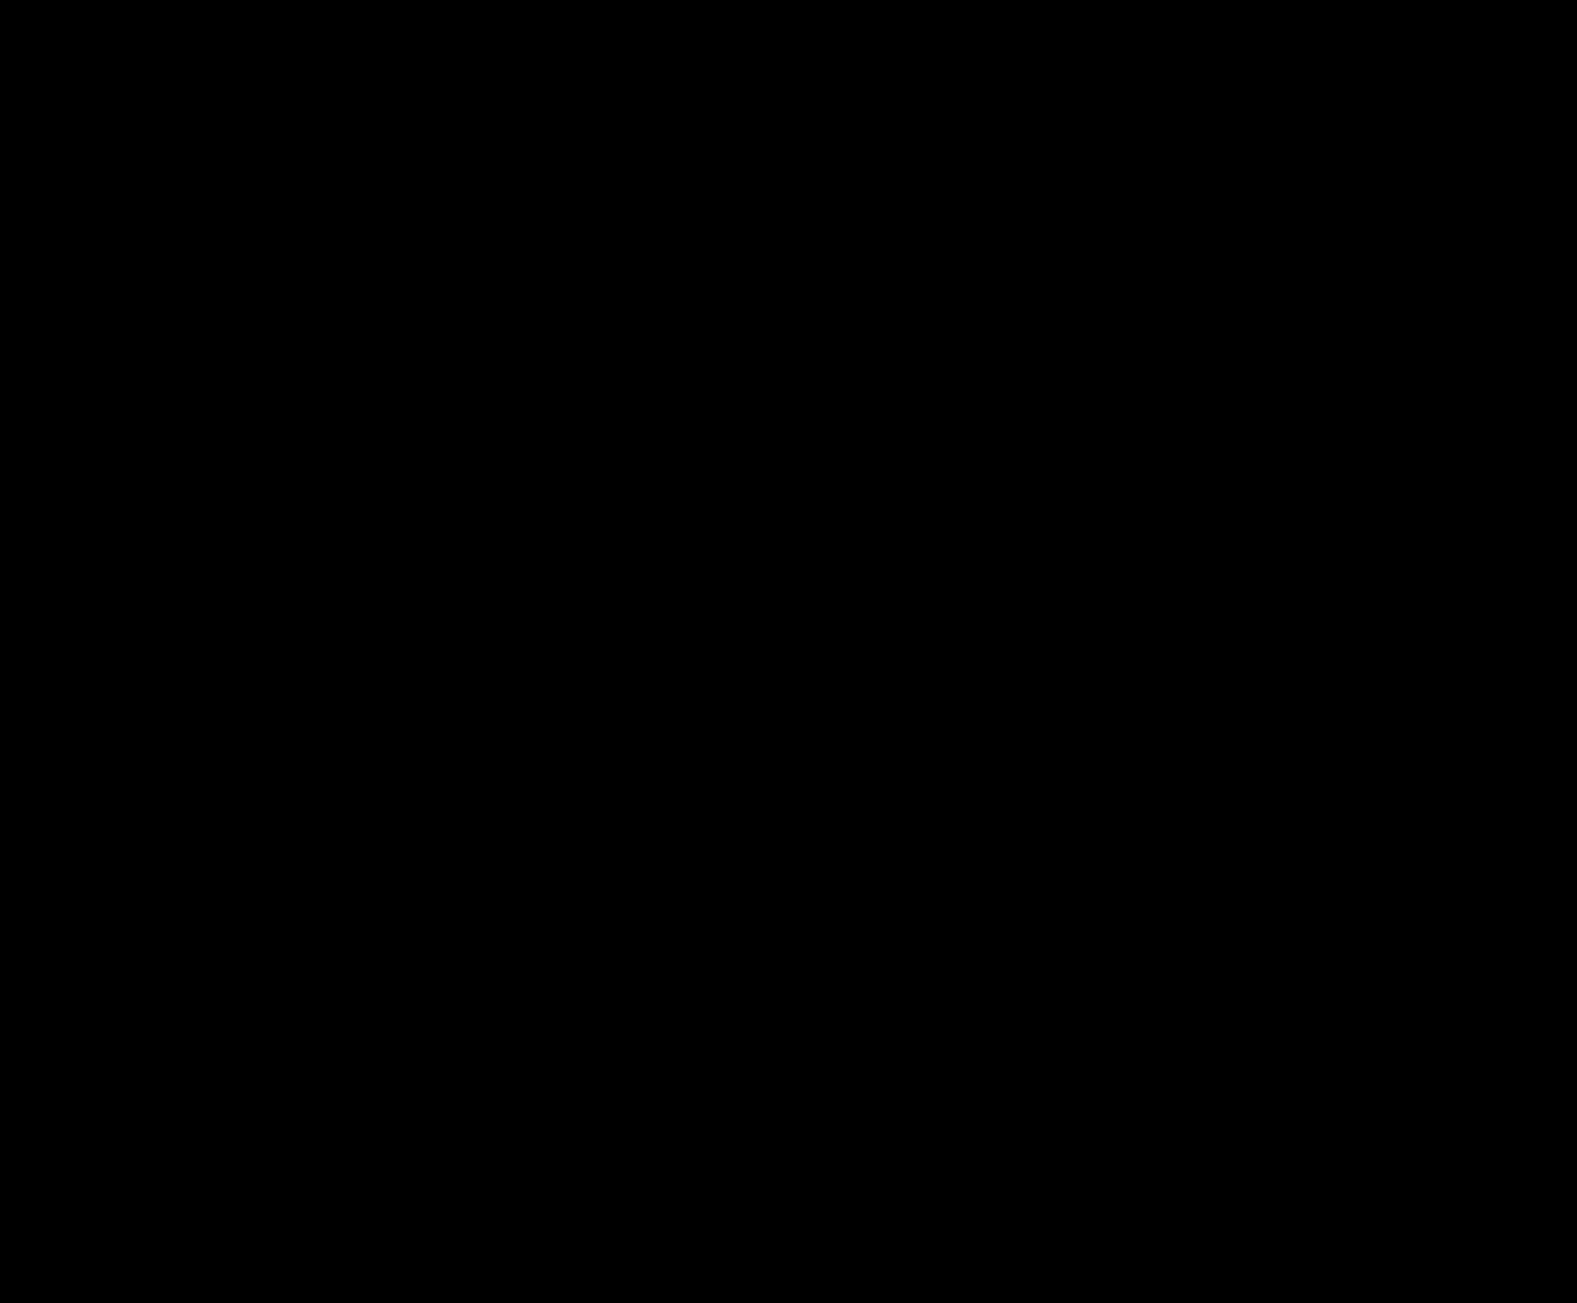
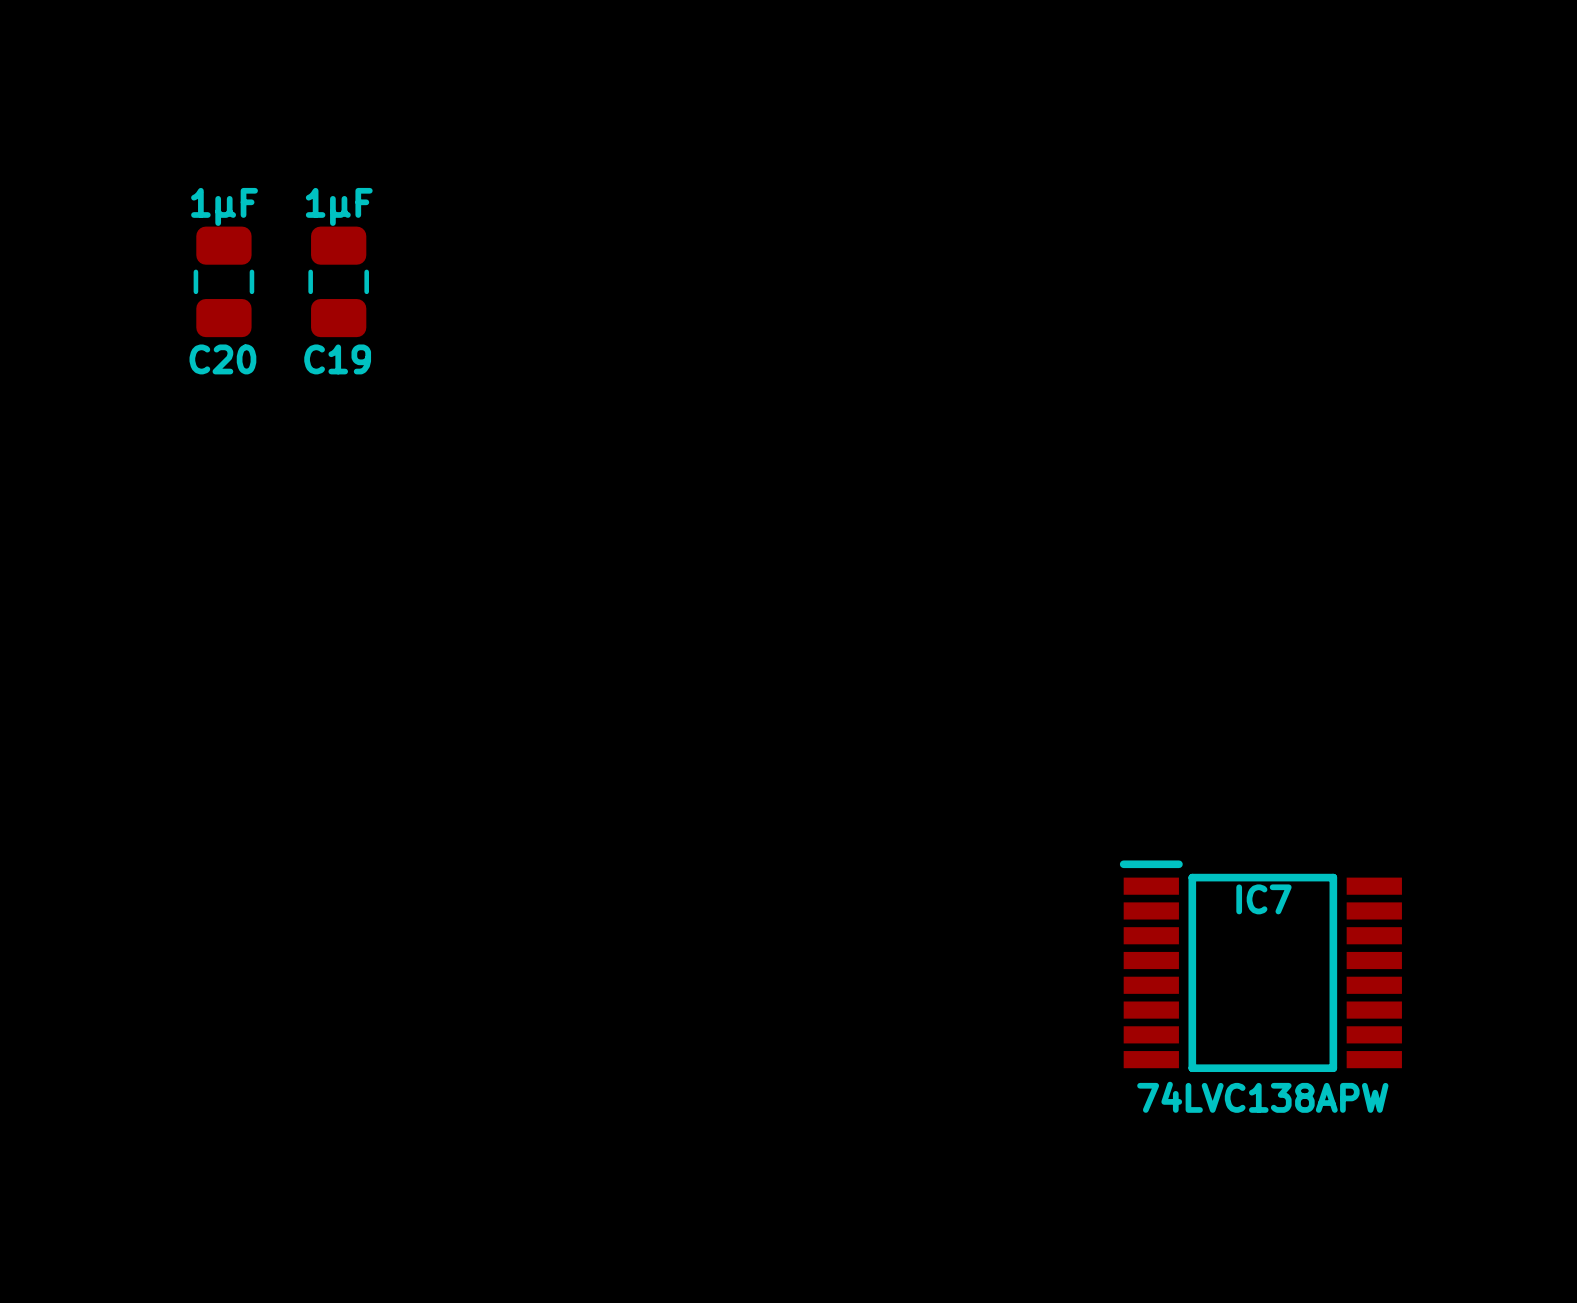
C20: none -> 1μF (223, 281)
C19: none -> 1μF (338, 281)
IC7: none -> (1260, 966)

